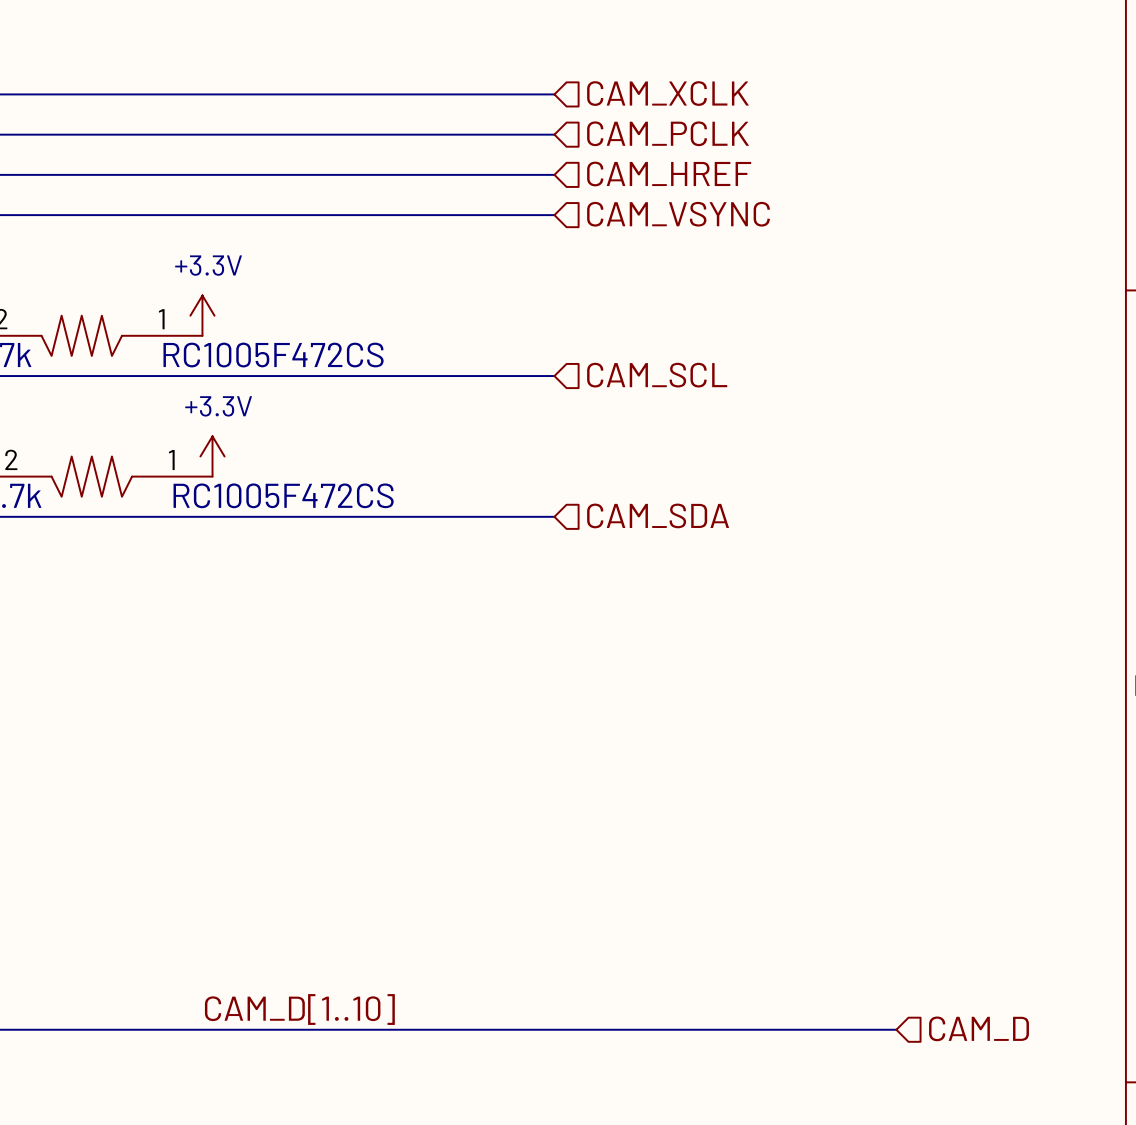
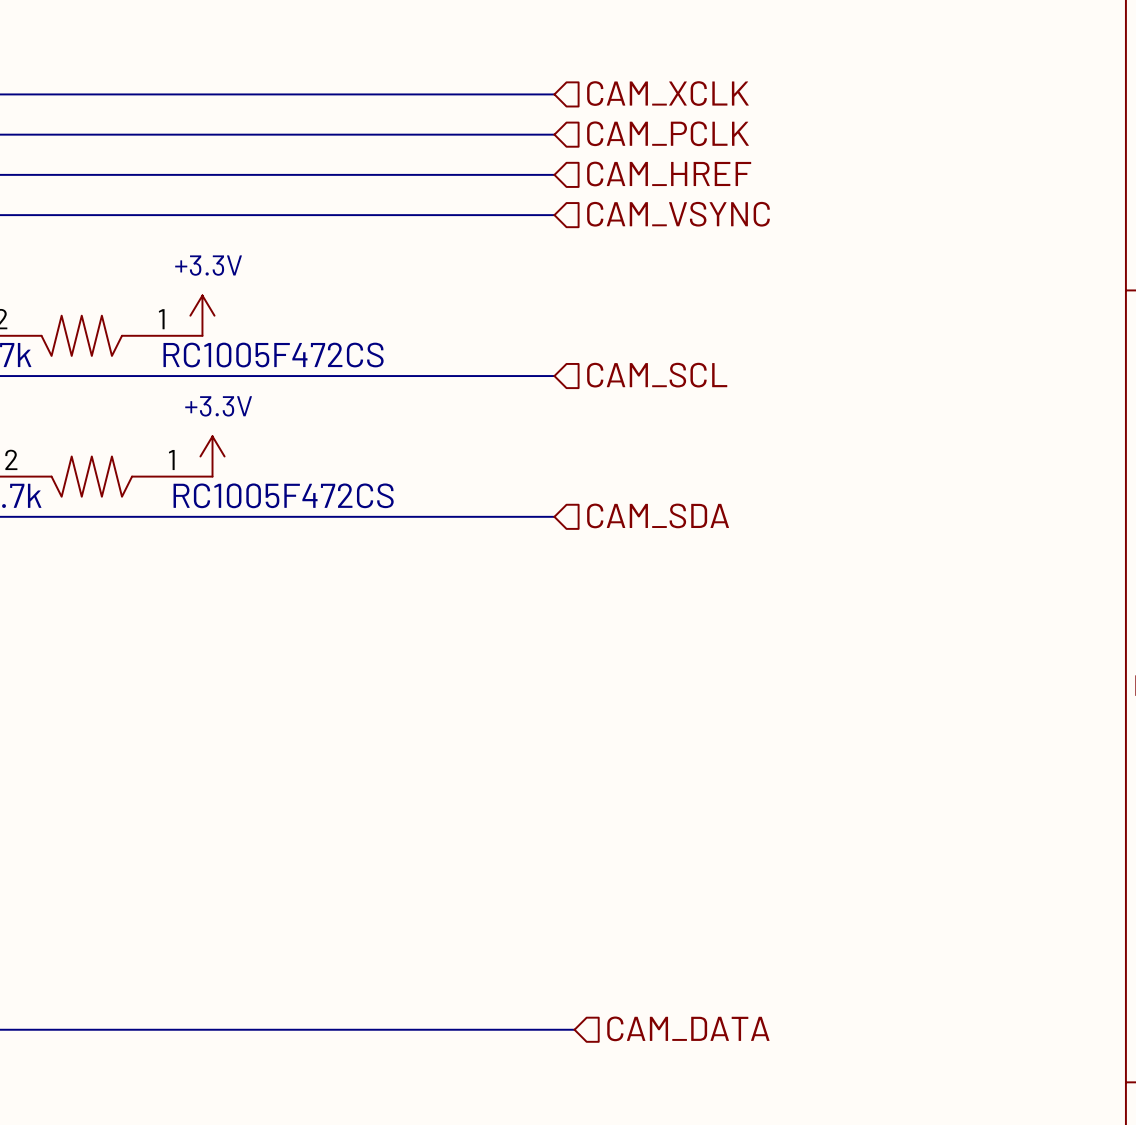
label: CAM_D[1..10] (299, 1009) -> none
hierarchical label: none -> CAM_DATA (688, 1028)
hierarchical label: CAM_D (979, 1028) -> none
bus: (574, 1029) (896, 1029) -> none

